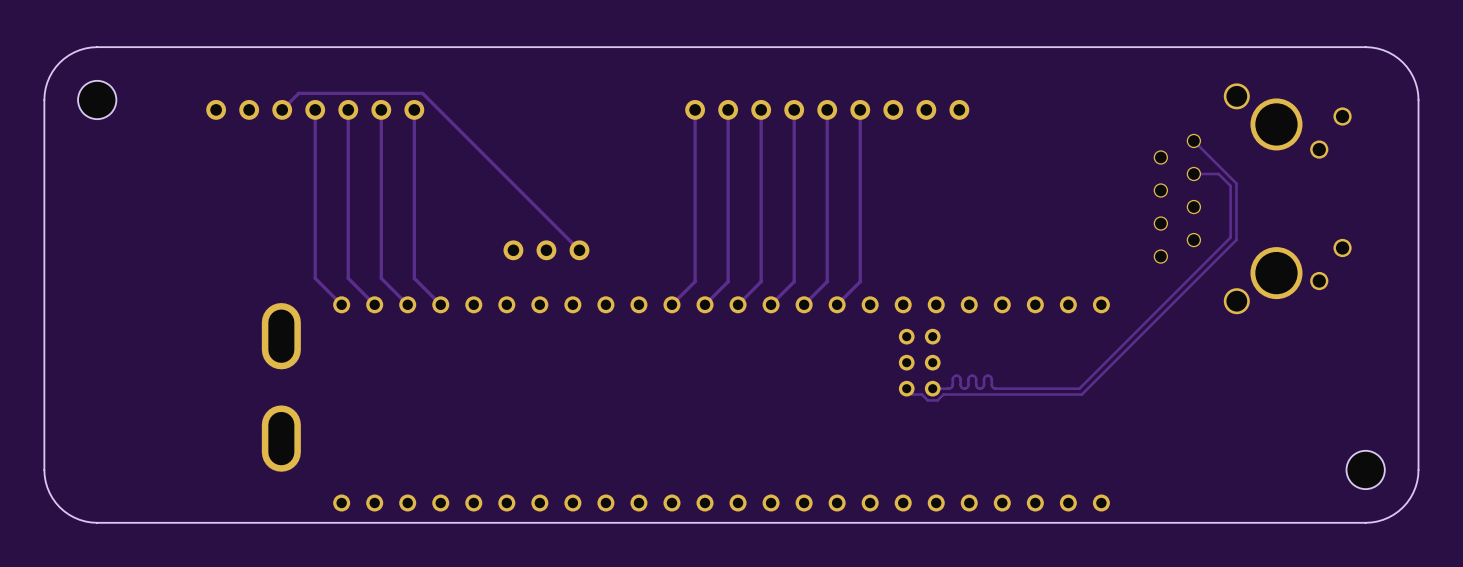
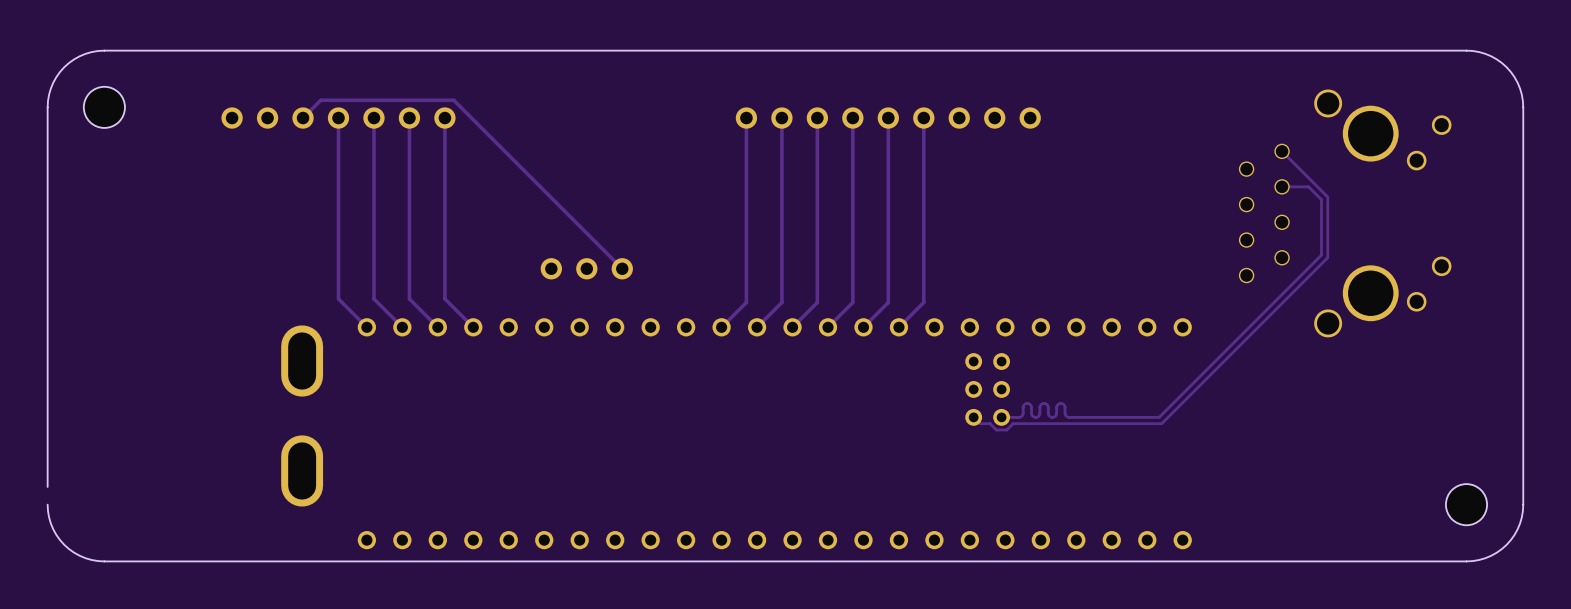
board edge: (44, 453) (44, 469) -> none

